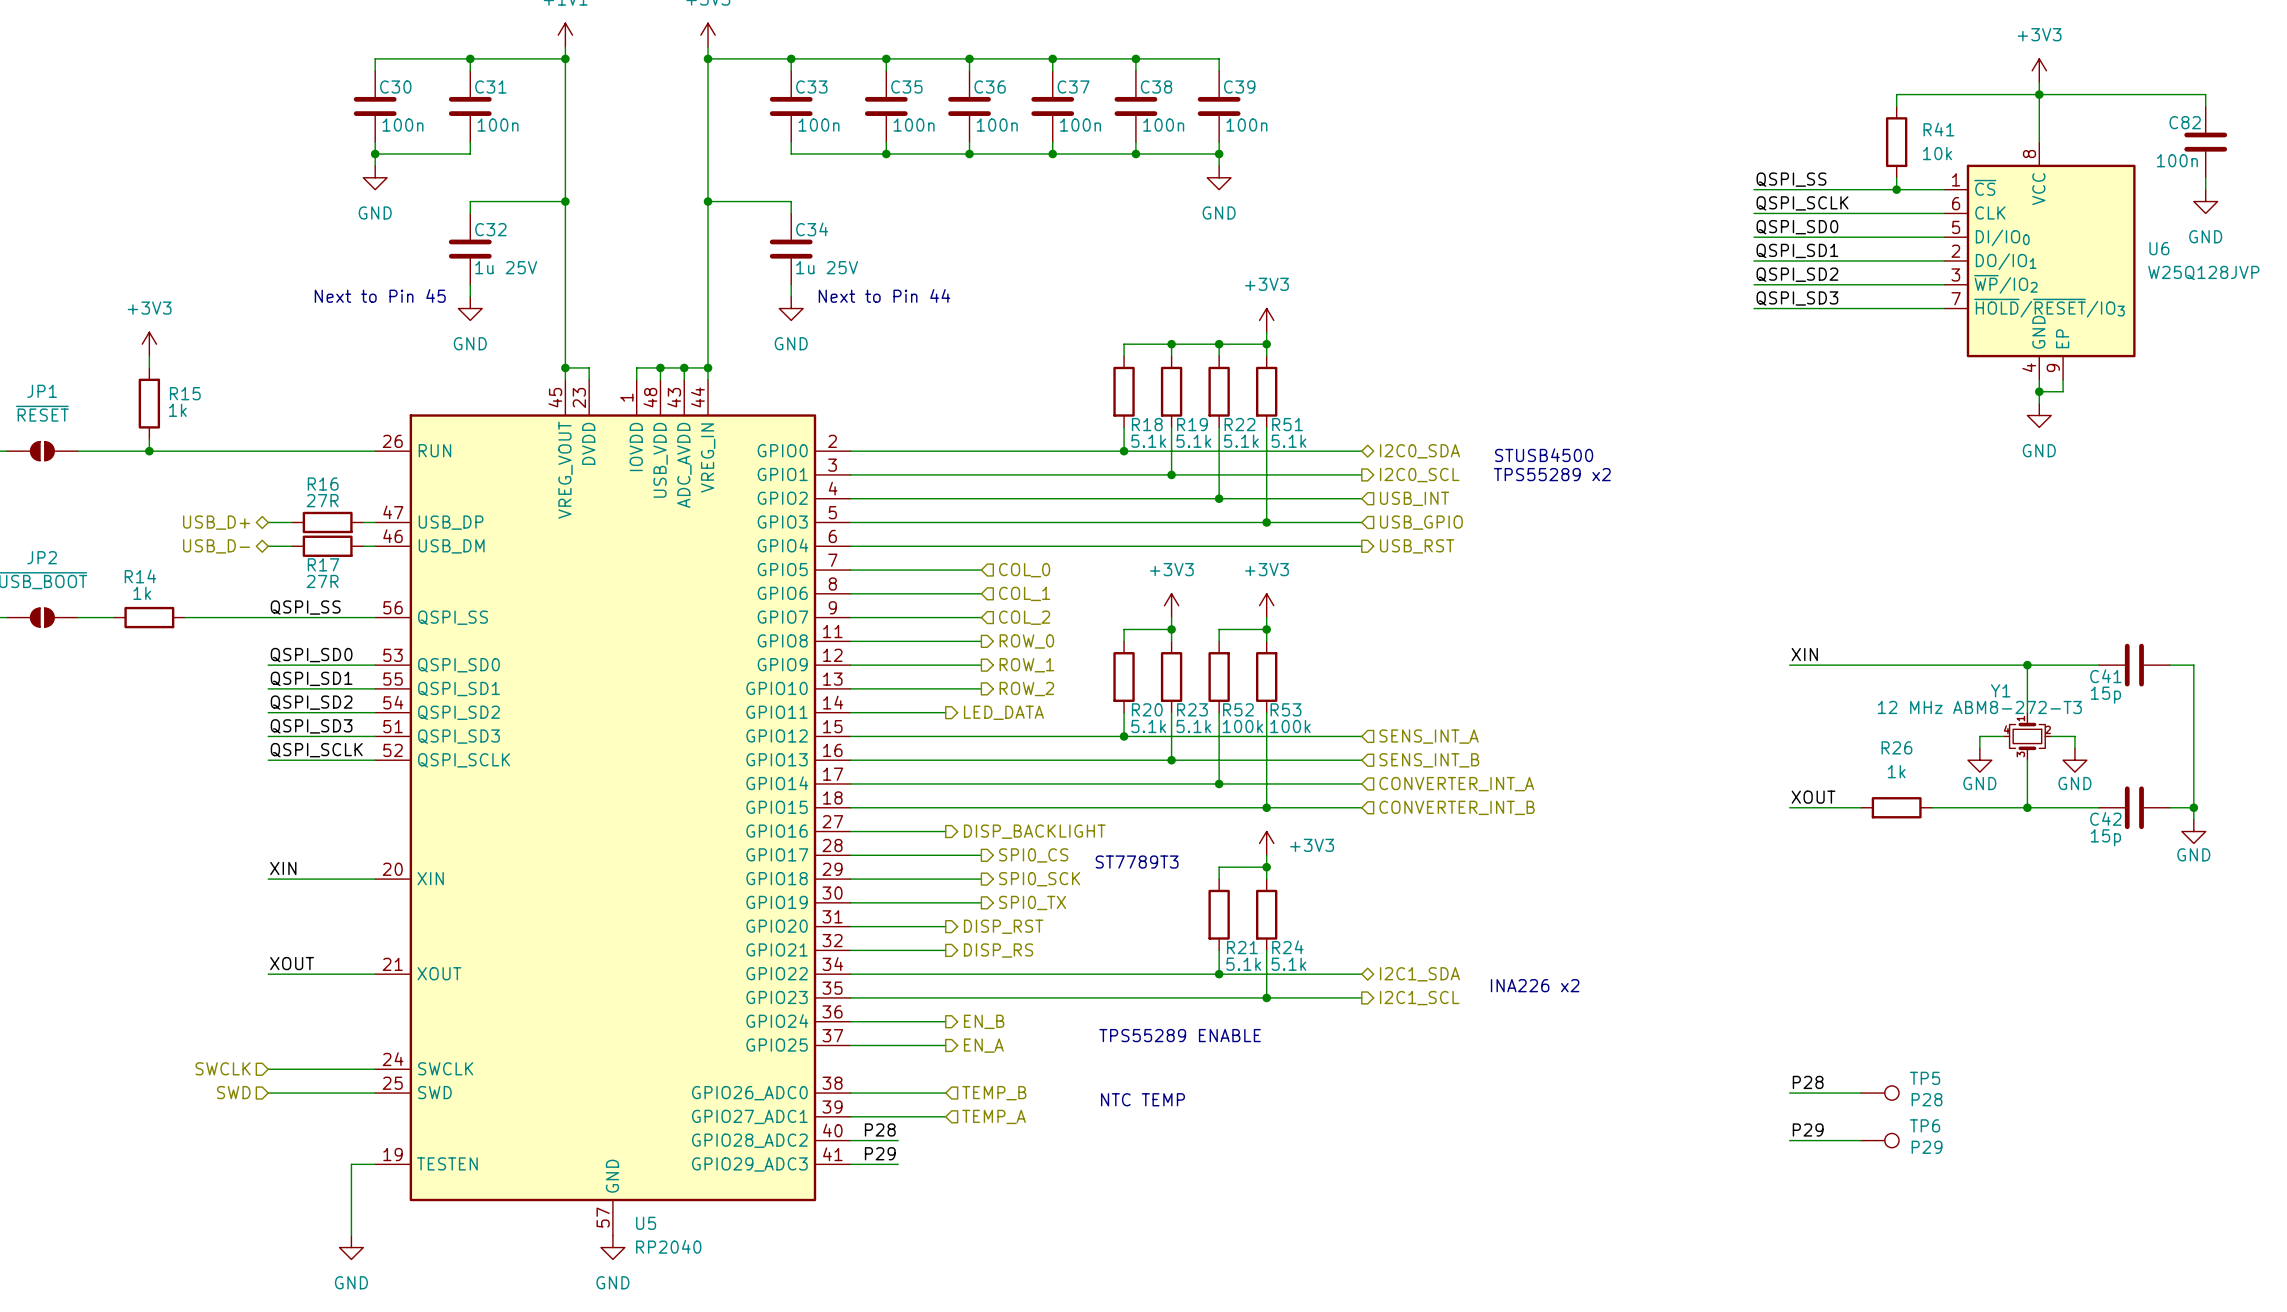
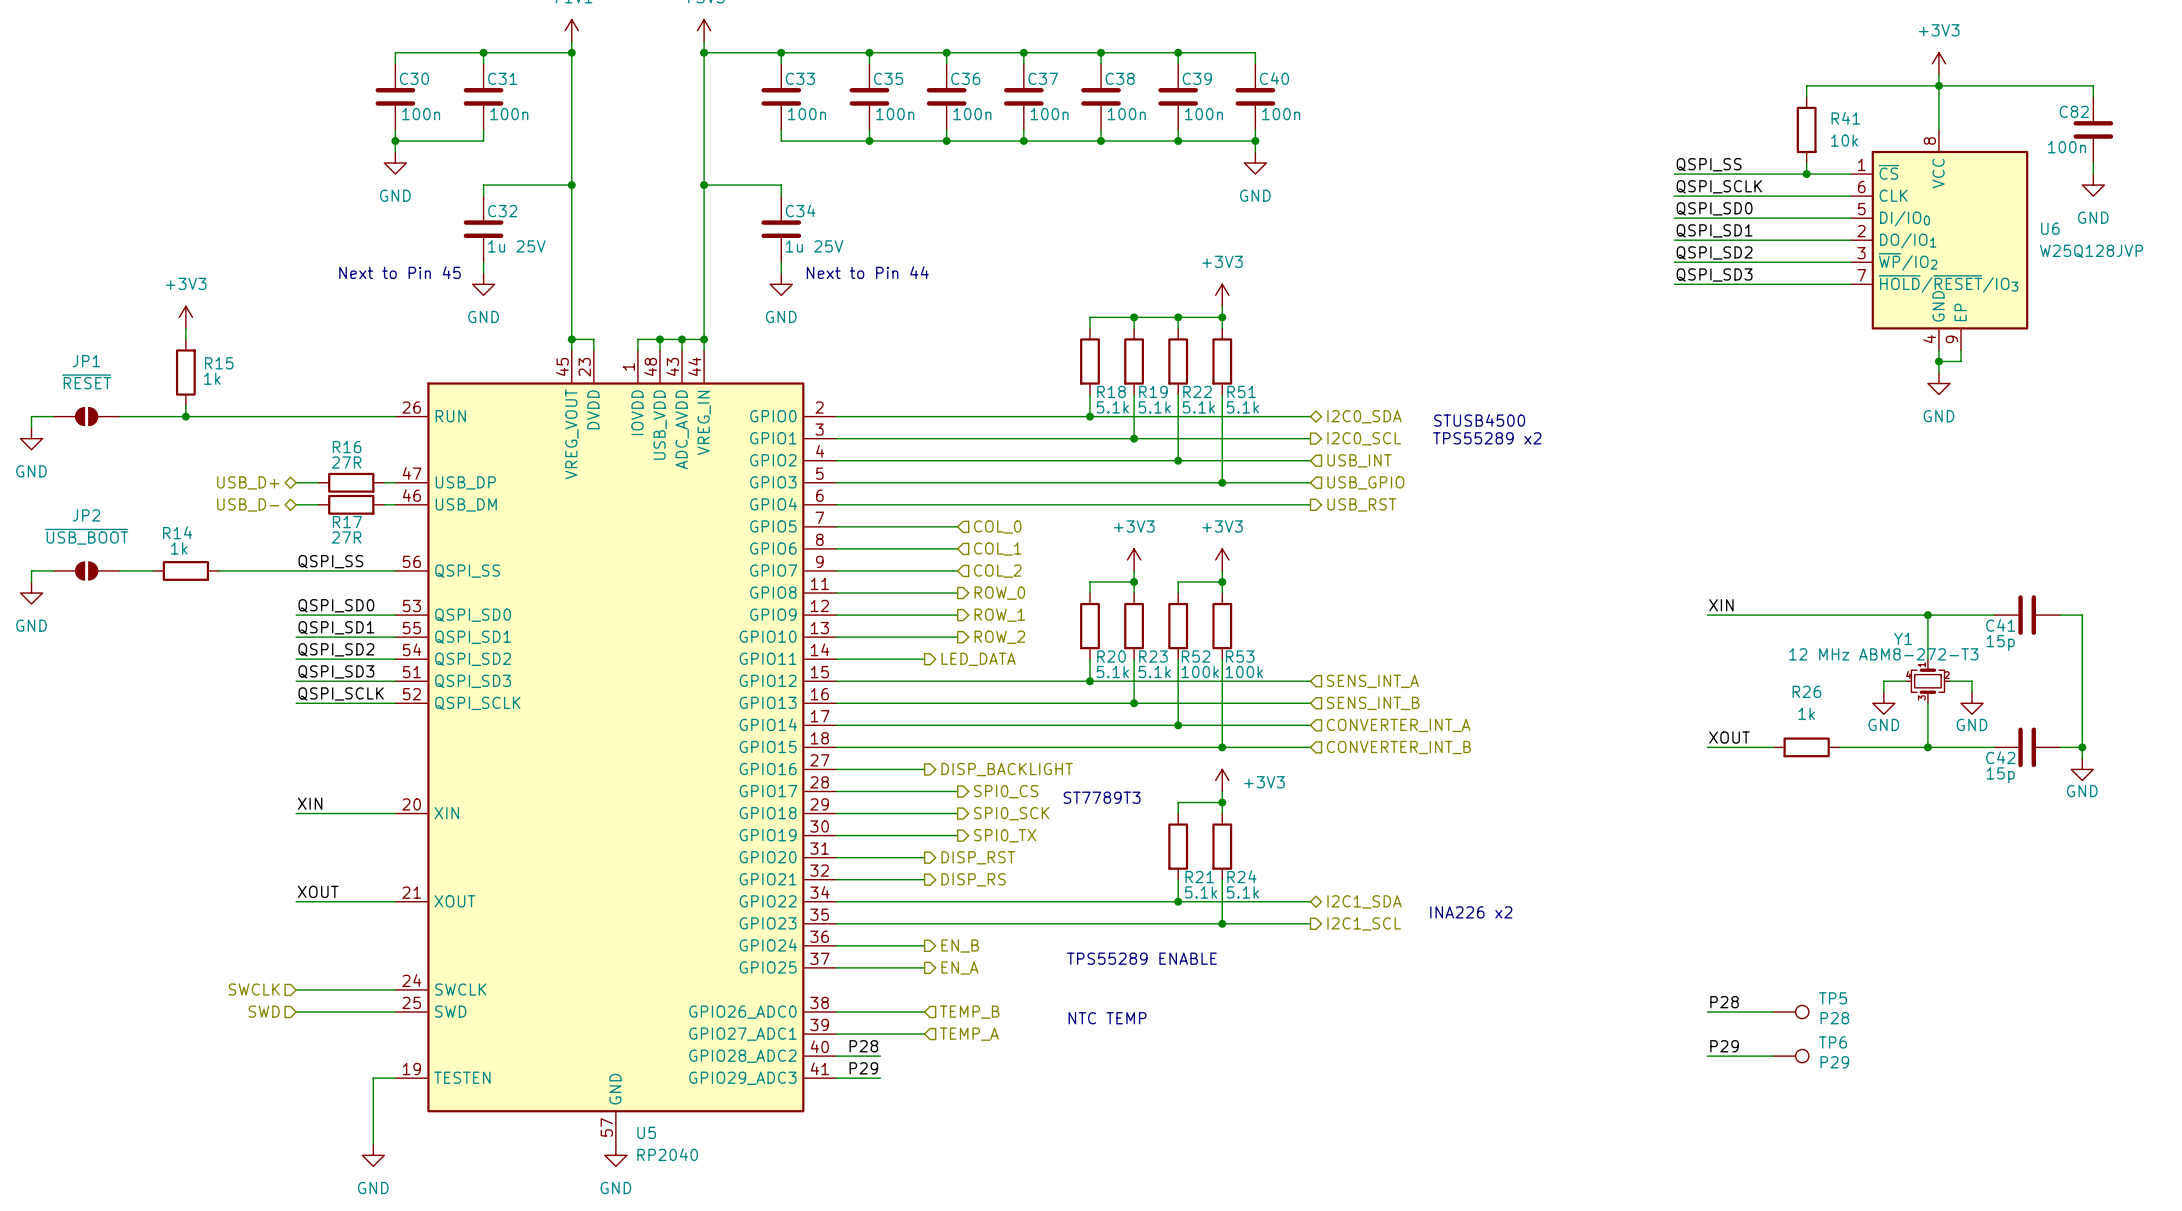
wire: none -> (1178, 52) (1255, 52) (1255, 63)
junction: none -> (1178, 52)
C40: none -> 100n (1255, 96)
wire: none -> (1255, 129) (1255, 151)
wire: (1219, 154) (1219, 165) -> (1178, 140) (1255, 140)
junction: none -> (1255, 140)
power symbol position: GND (1219, 177) -> GND (1255, 163)

